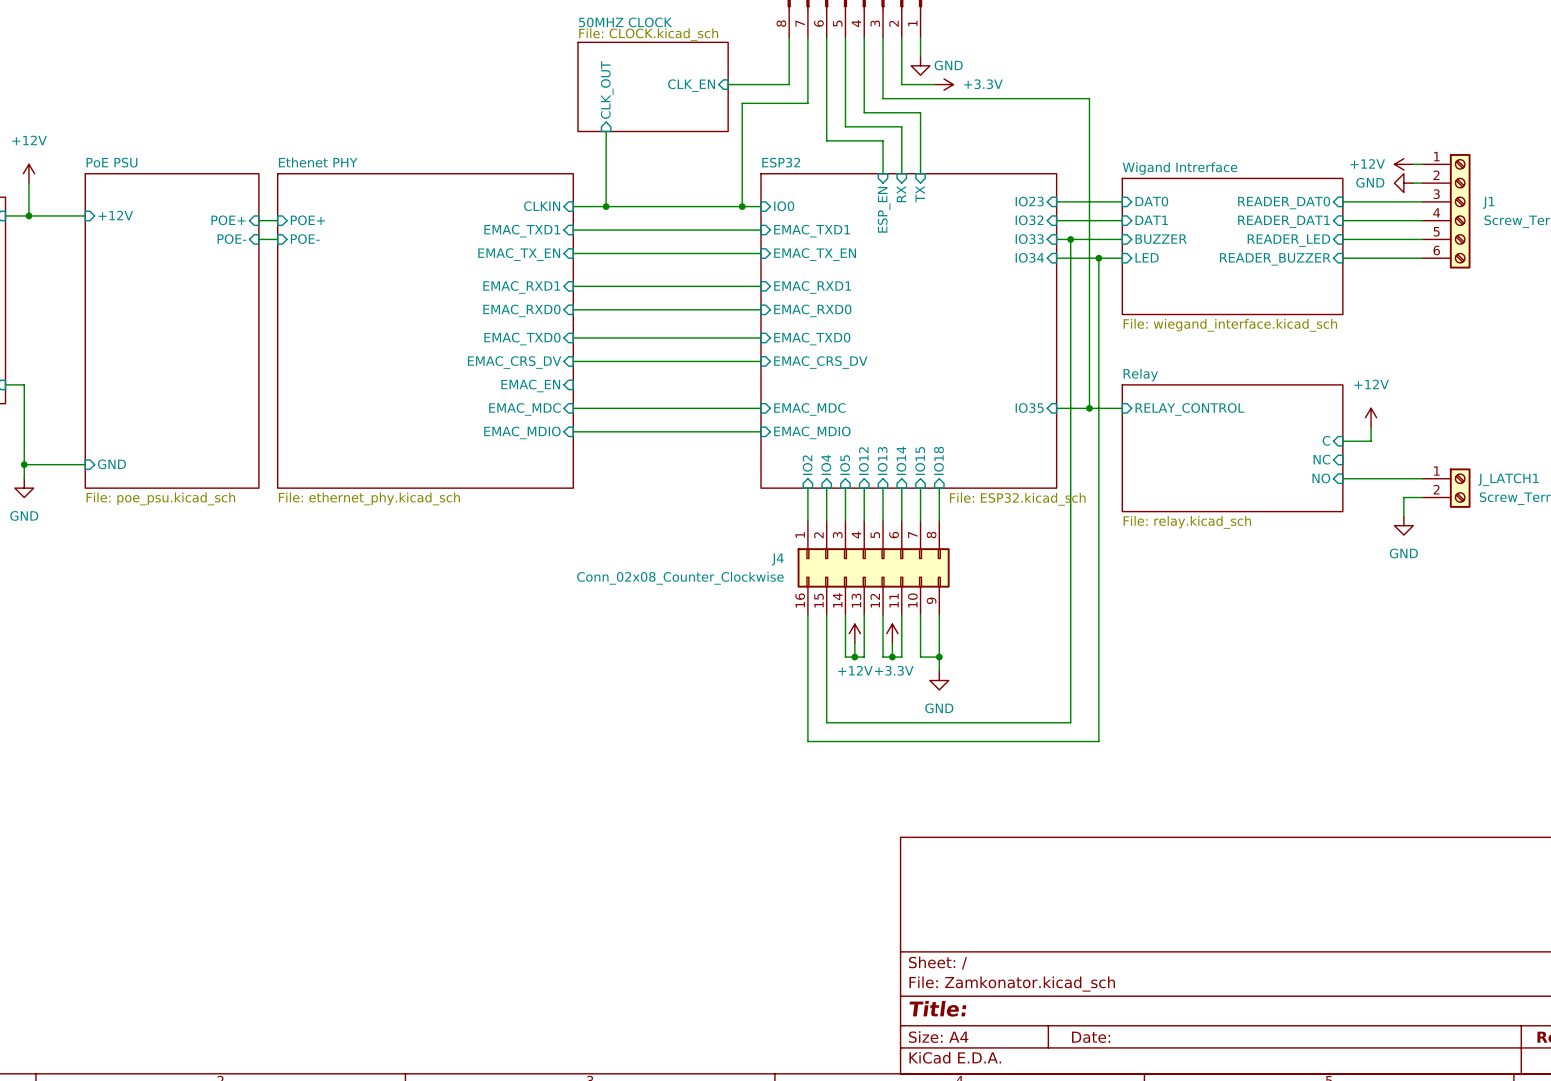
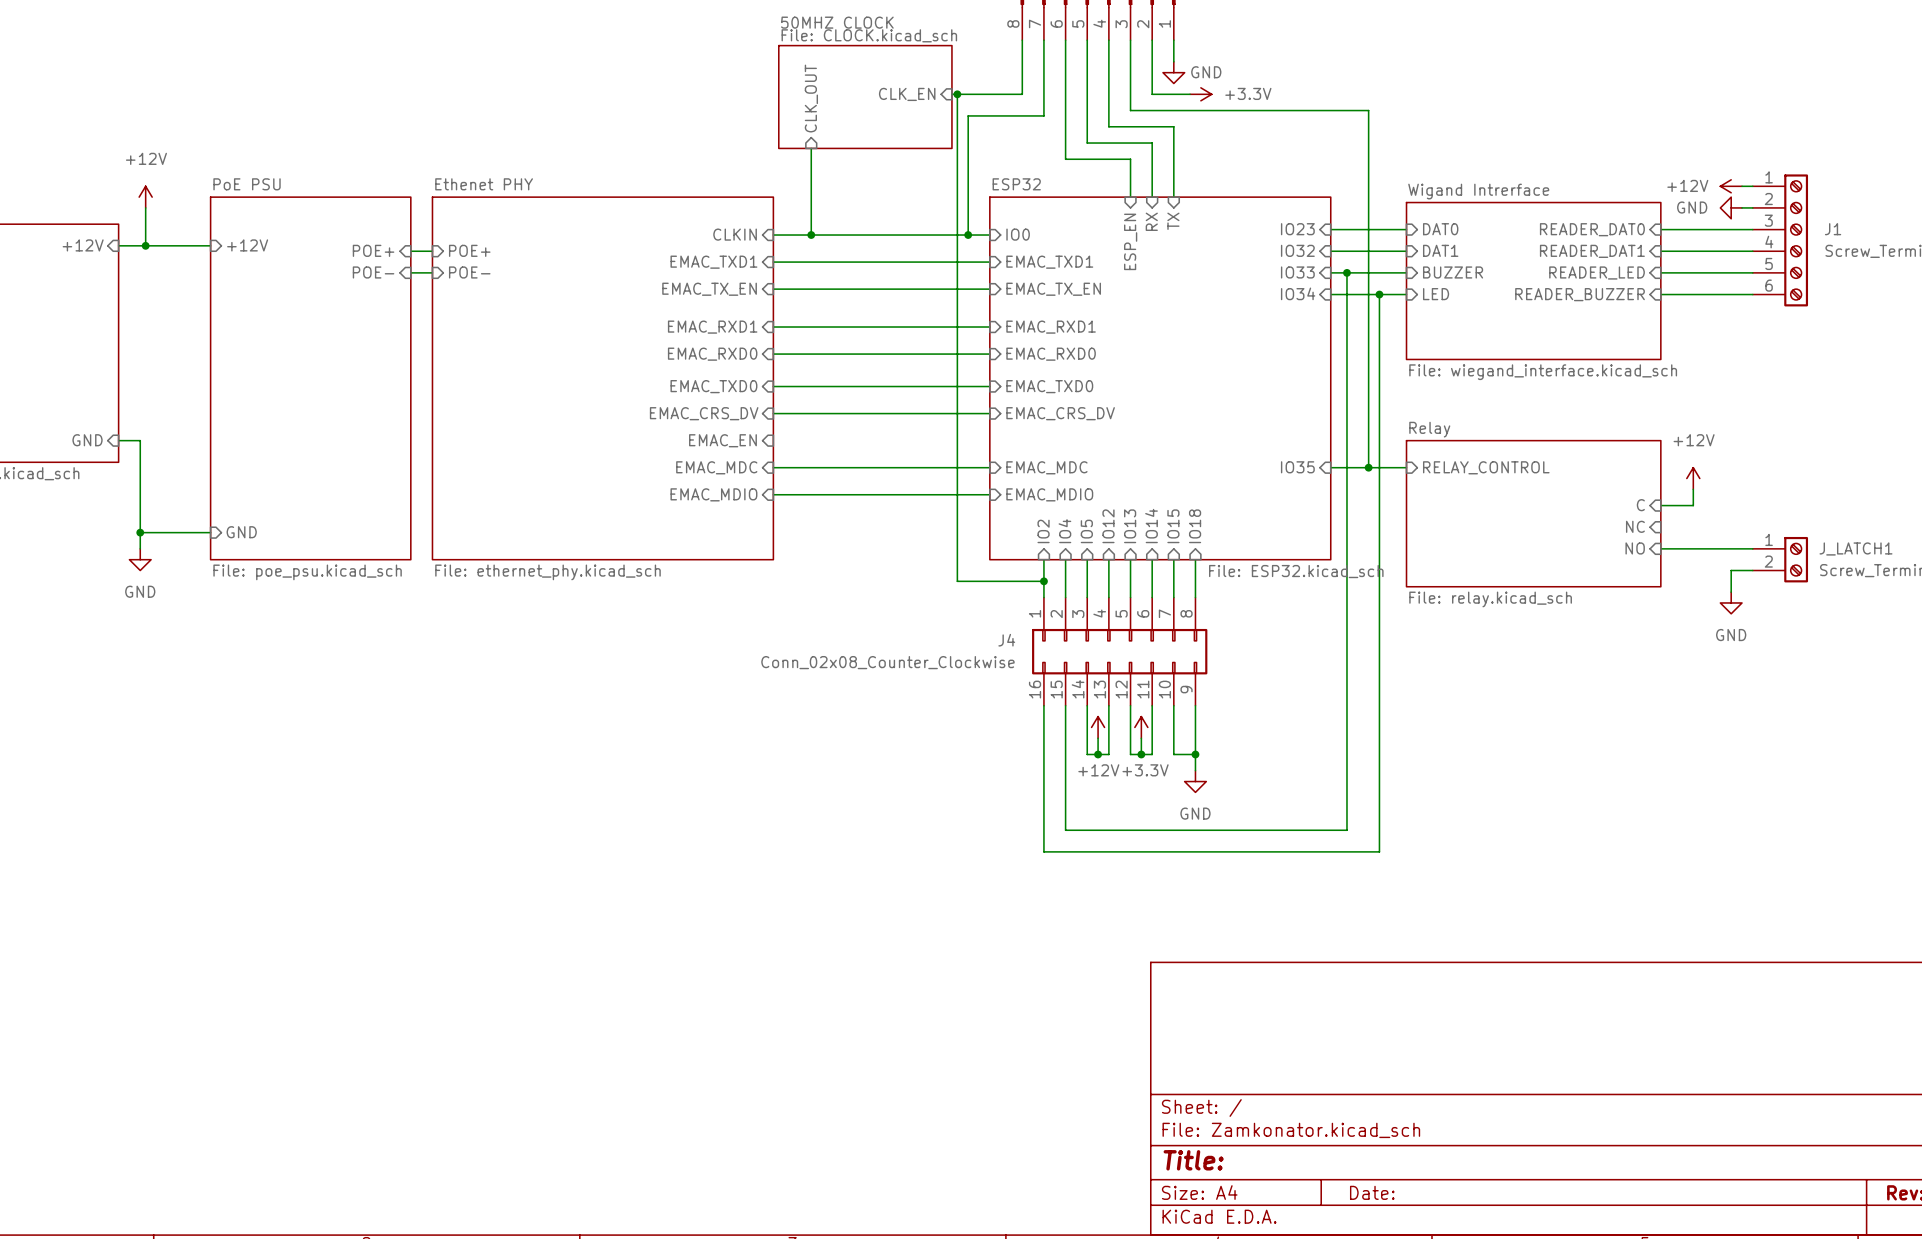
wire: none -> (957, 94) (957, 581) (1043, 581)
junction: none -> (957, 94)
junction: none -> (1043, 581)

